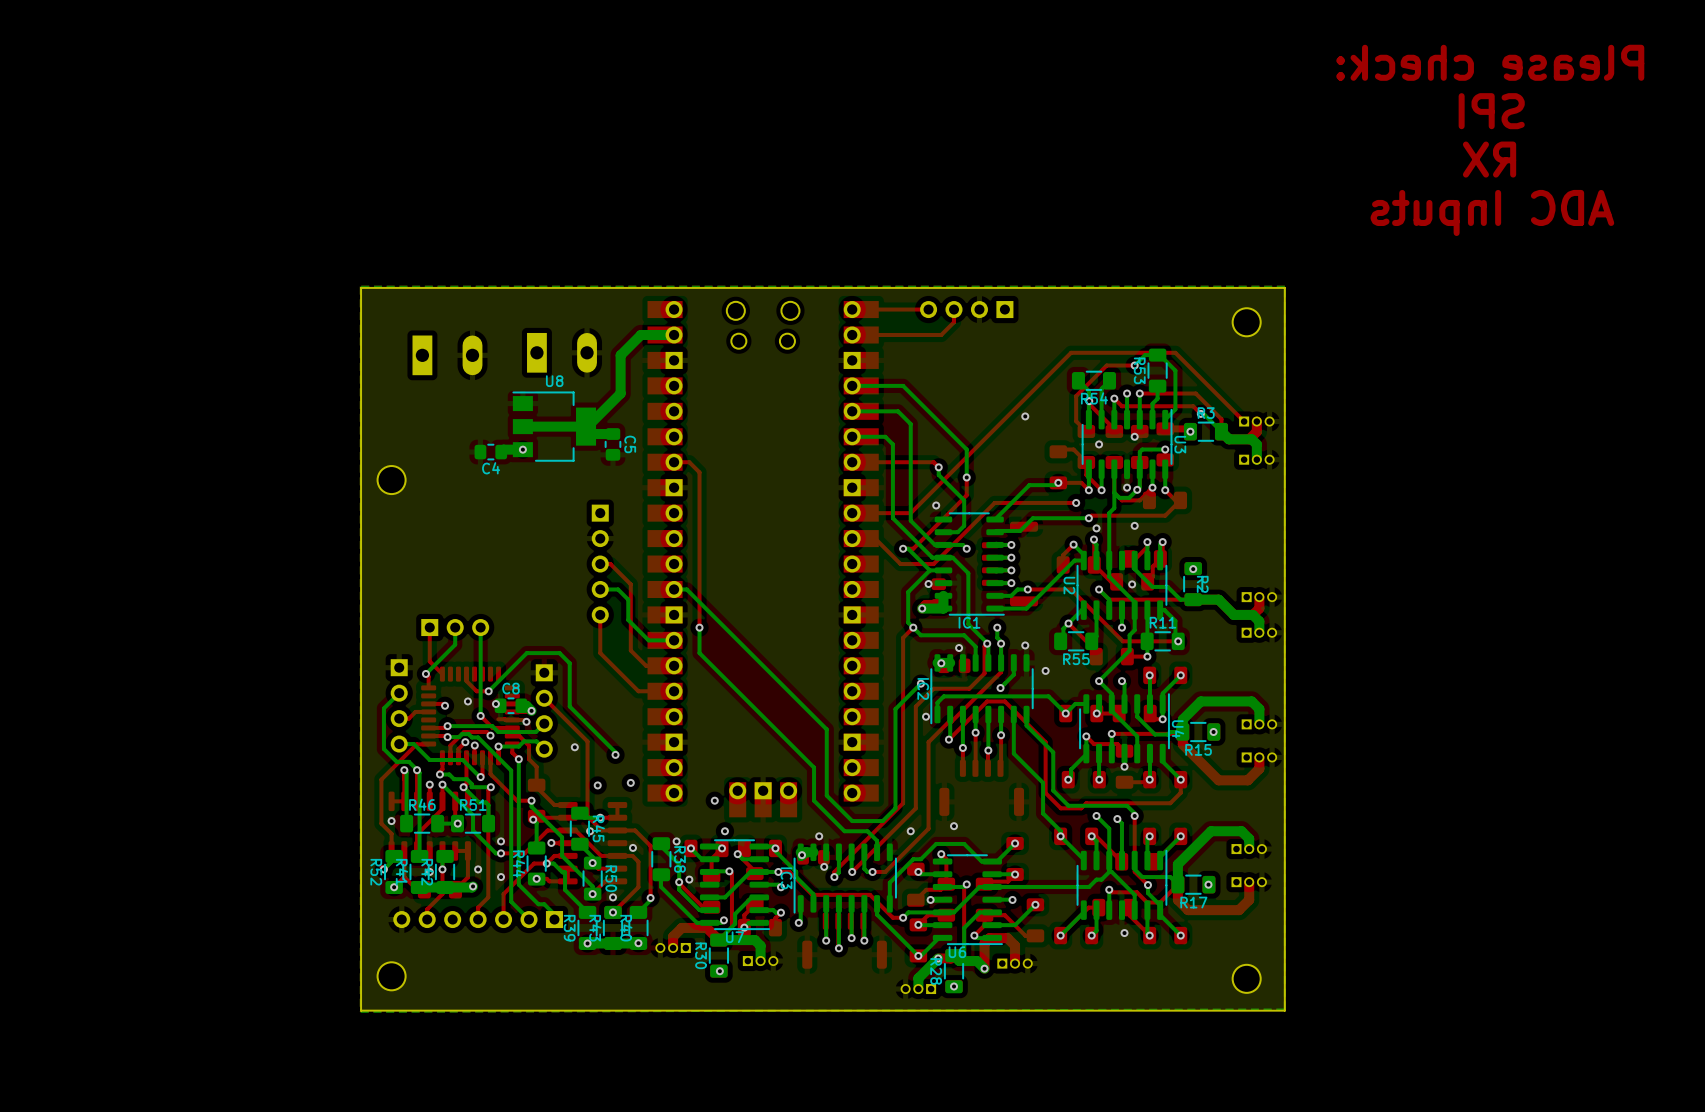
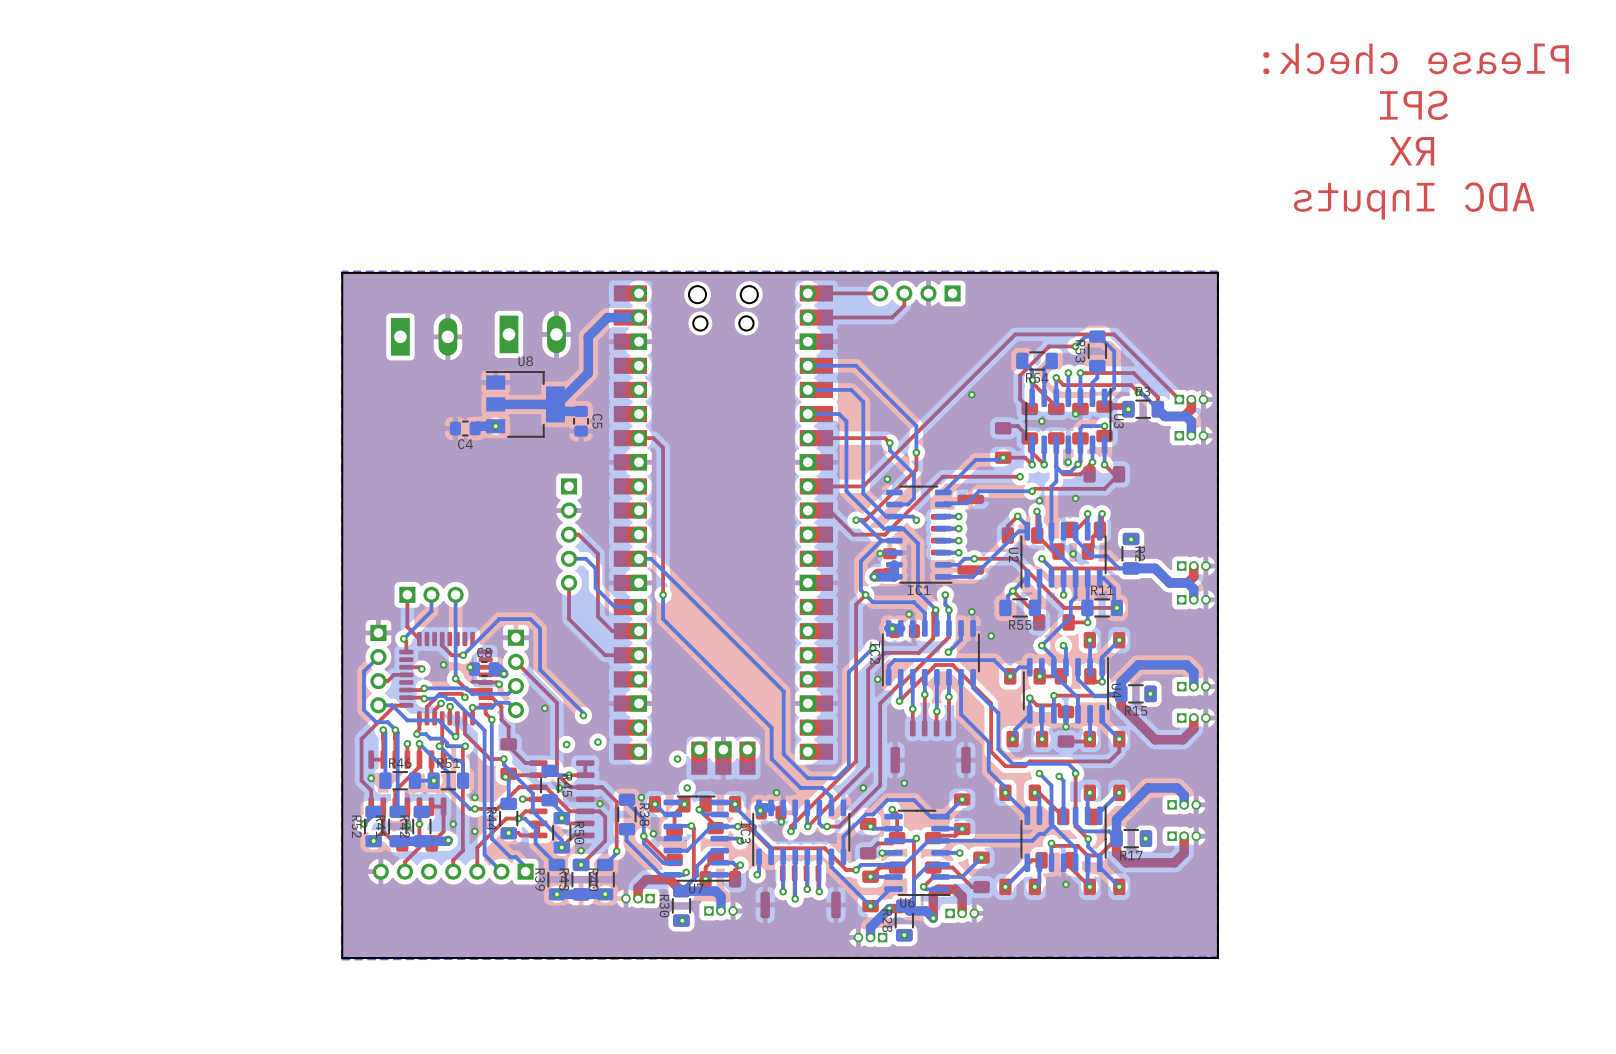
round board edge: [1232, 307, 1262, 337] -> none
round board edge: [377, 465, 407, 495] -> none
round board edge: [377, 961, 407, 991] -> none
round board edge: [1232, 964, 1262, 994] -> none

